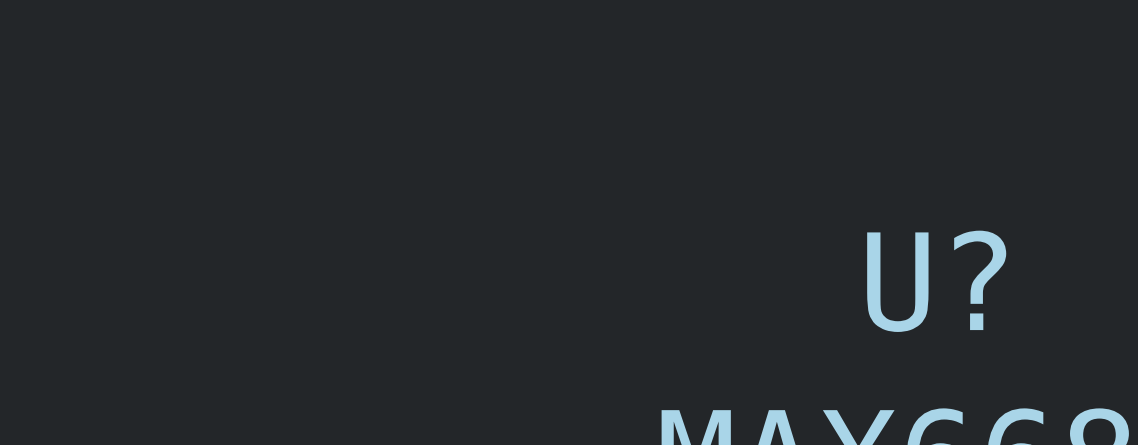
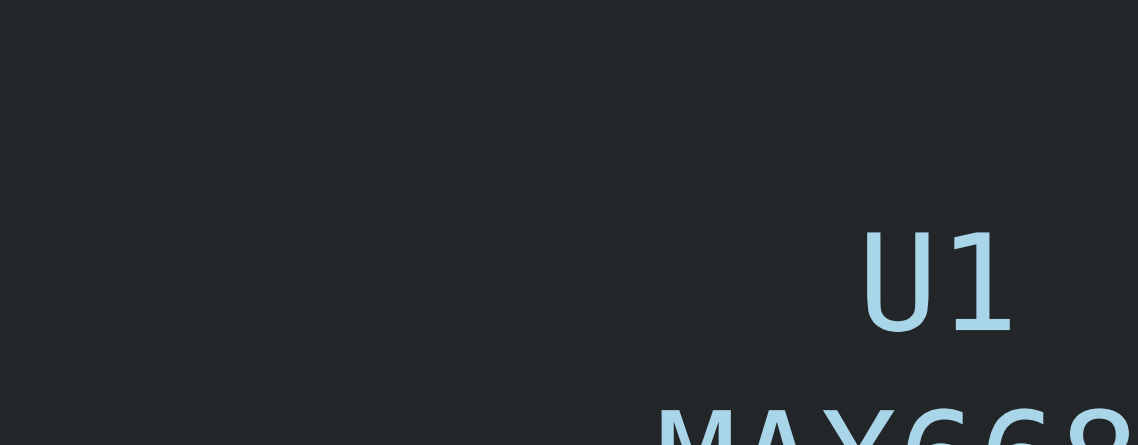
U? name: U? (936, 281) -> U1 (938, 282)

